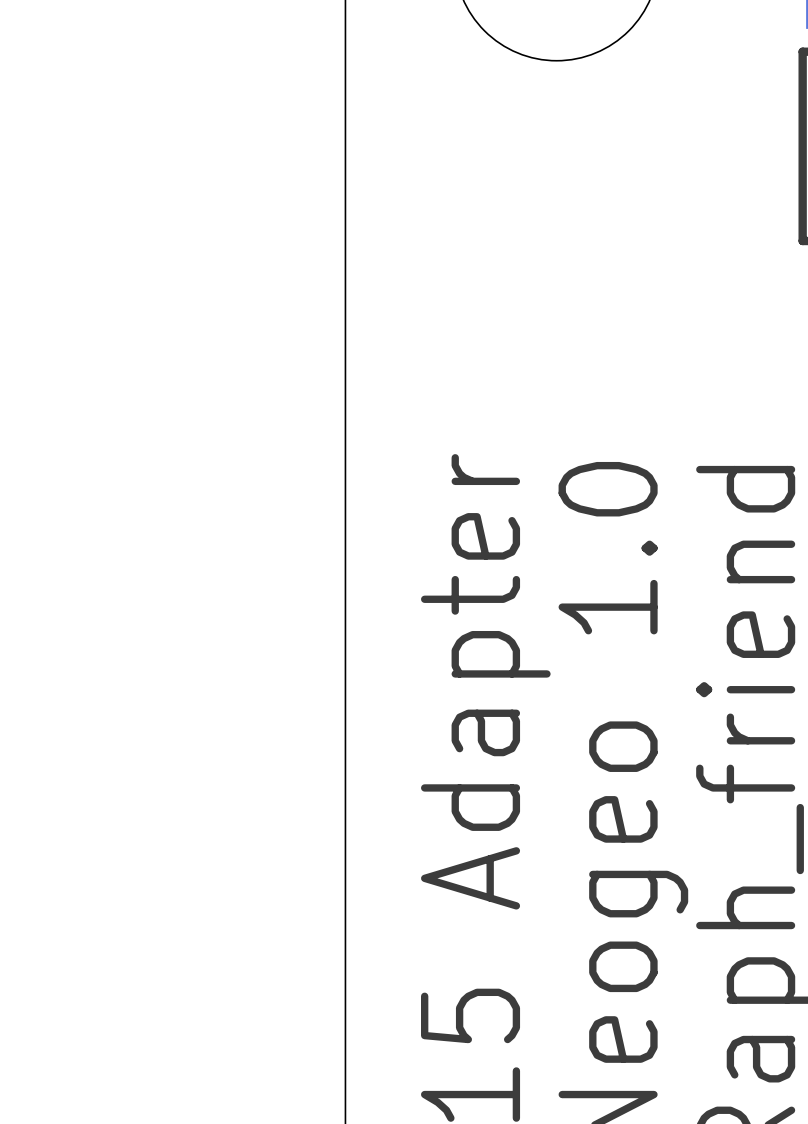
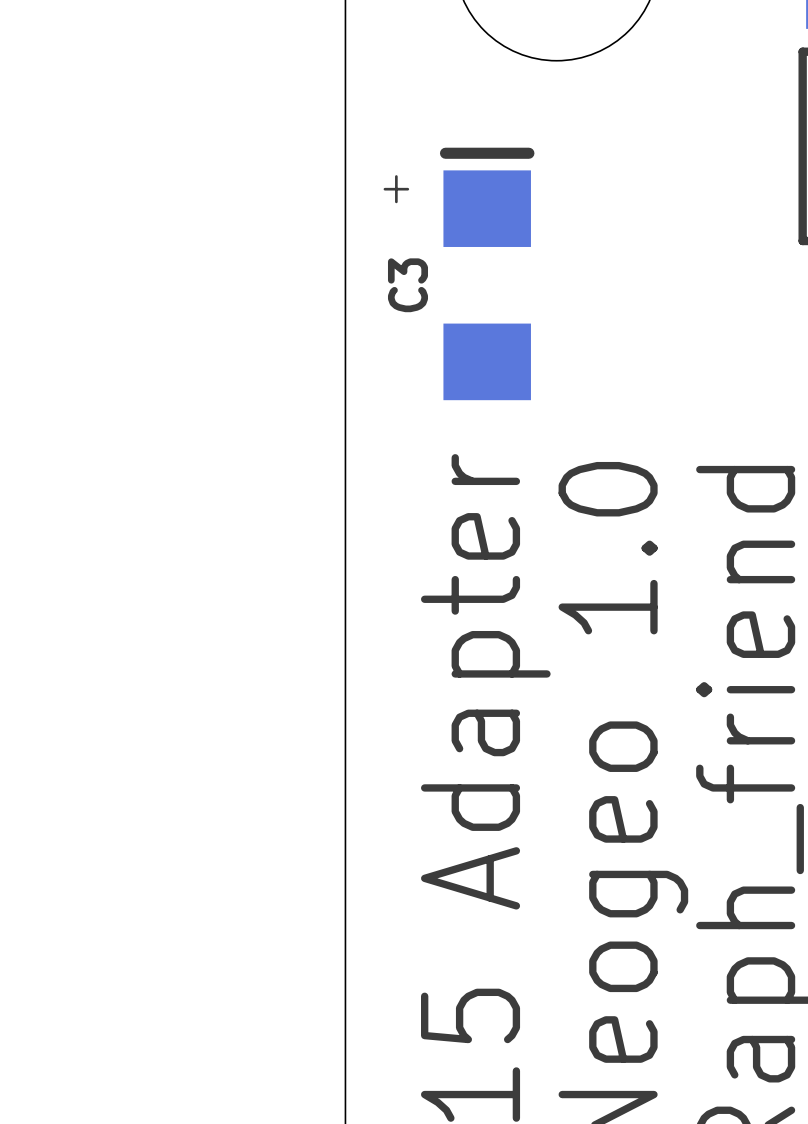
text: none -> + (396, 189)
C3: none -> (487, 273)

